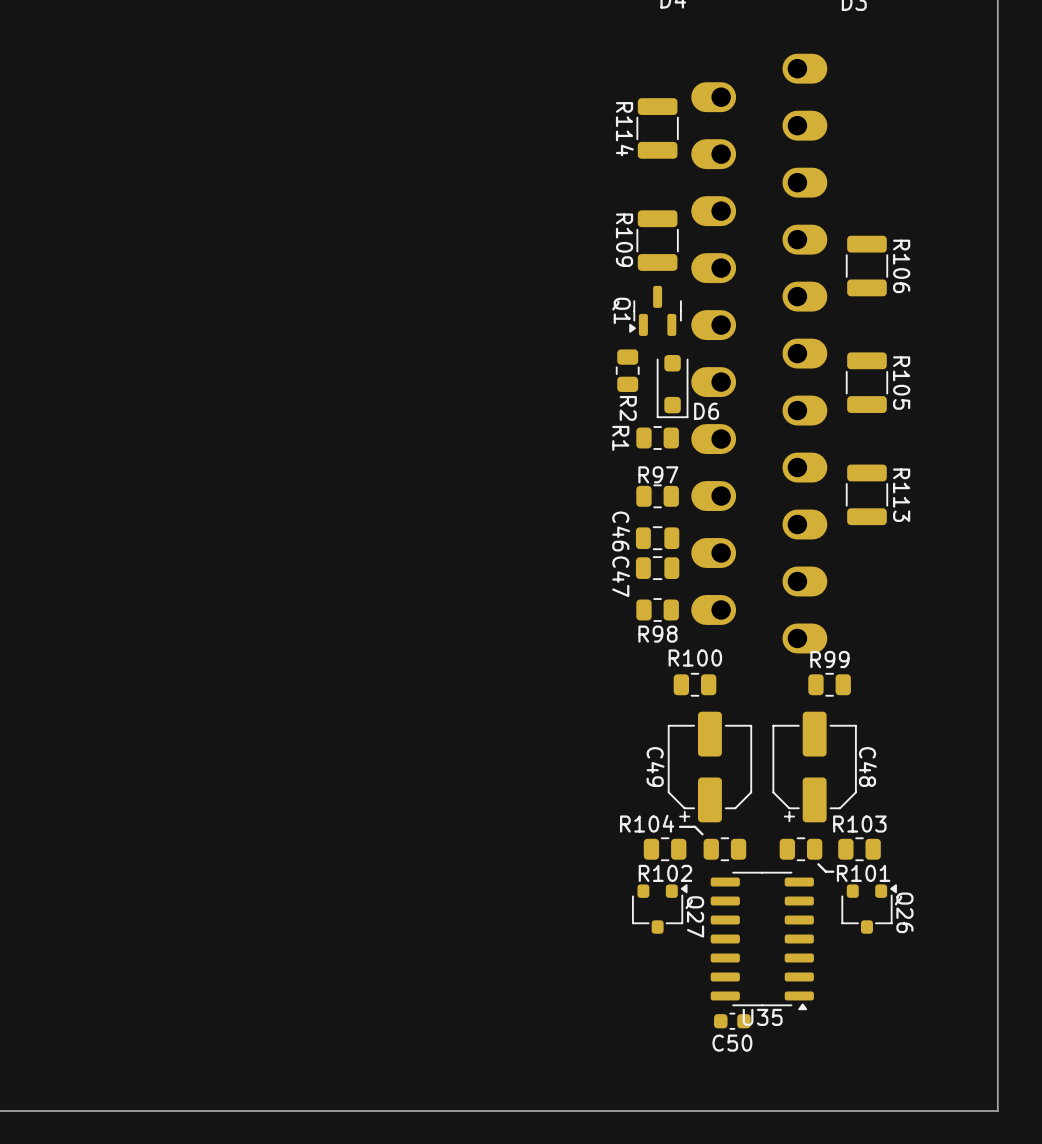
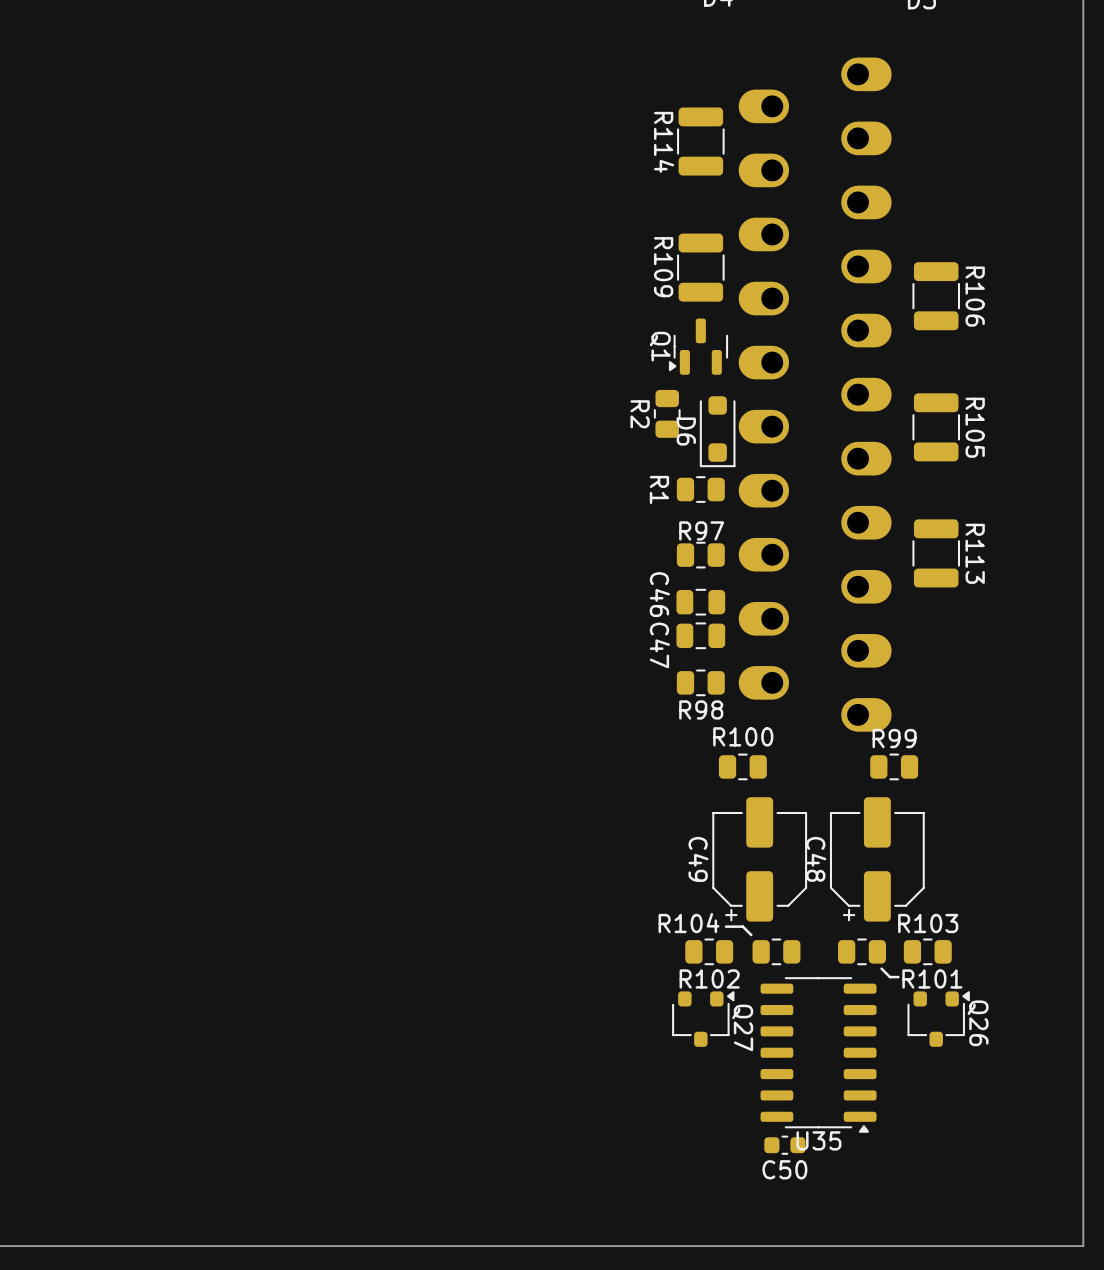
R2 name position: R2 (628, 408) -> R2 (640, 414)
D6 name rotation: 0° (706, 411) -> 90° clockwise (686, 431)
D6 name position: D6 (706, 411) -> D6 (686, 431)
C48 name position: C48 (867, 767) -> C48 (816, 859)

